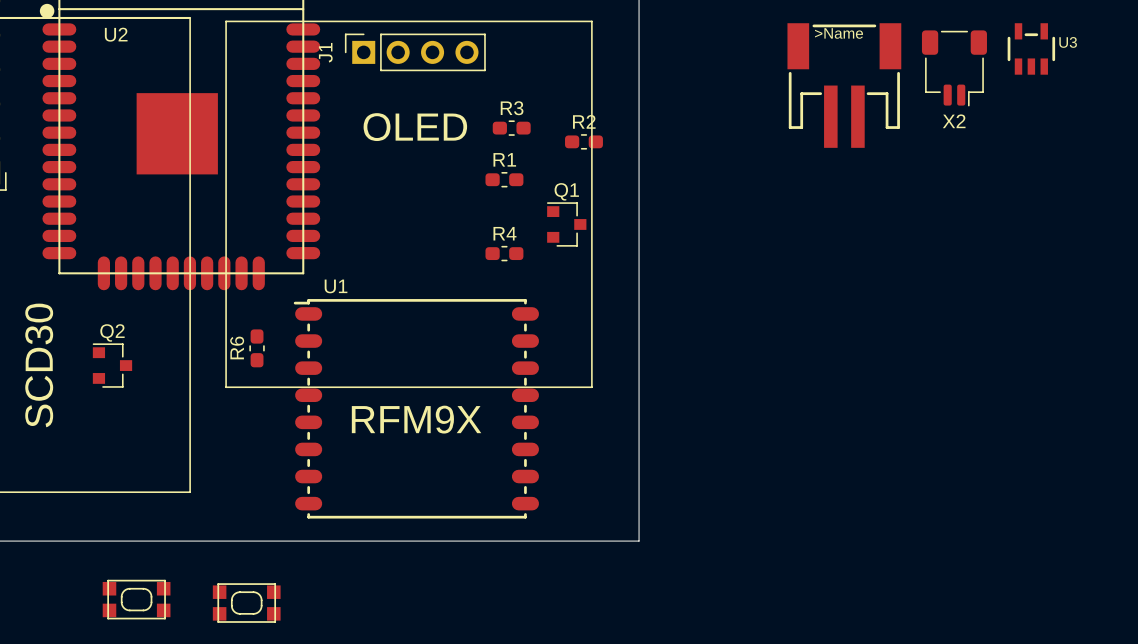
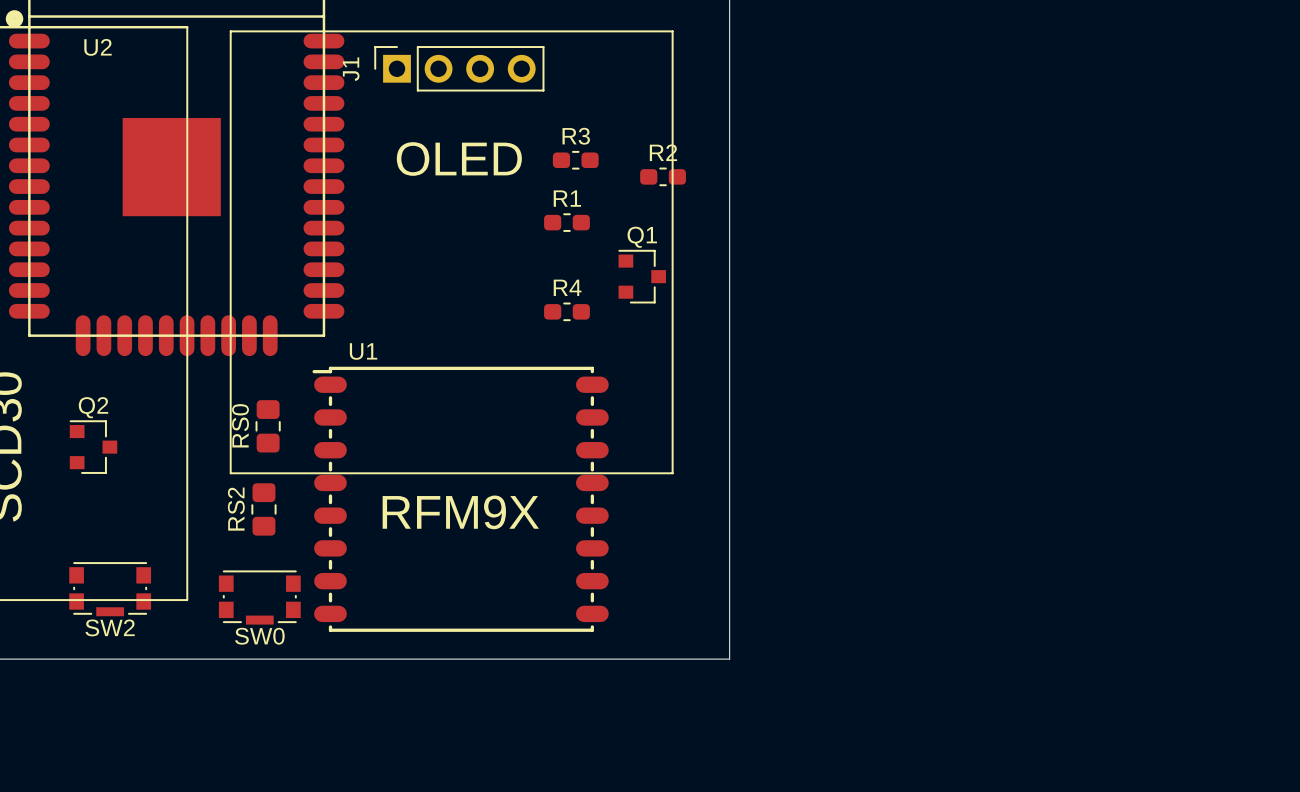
U3: (1031, 48) -> none
X2: (954, 68) -> none
part: (844, 85) -> none
R6: (257, 348) -> none
RS0: none -> (268, 426)
RS2: none -> (263, 509)
SW2: none -> (110, 589)
SW0: none -> (259, 597)
part: (136, 599) -> none
part: (246, 603) -> none

